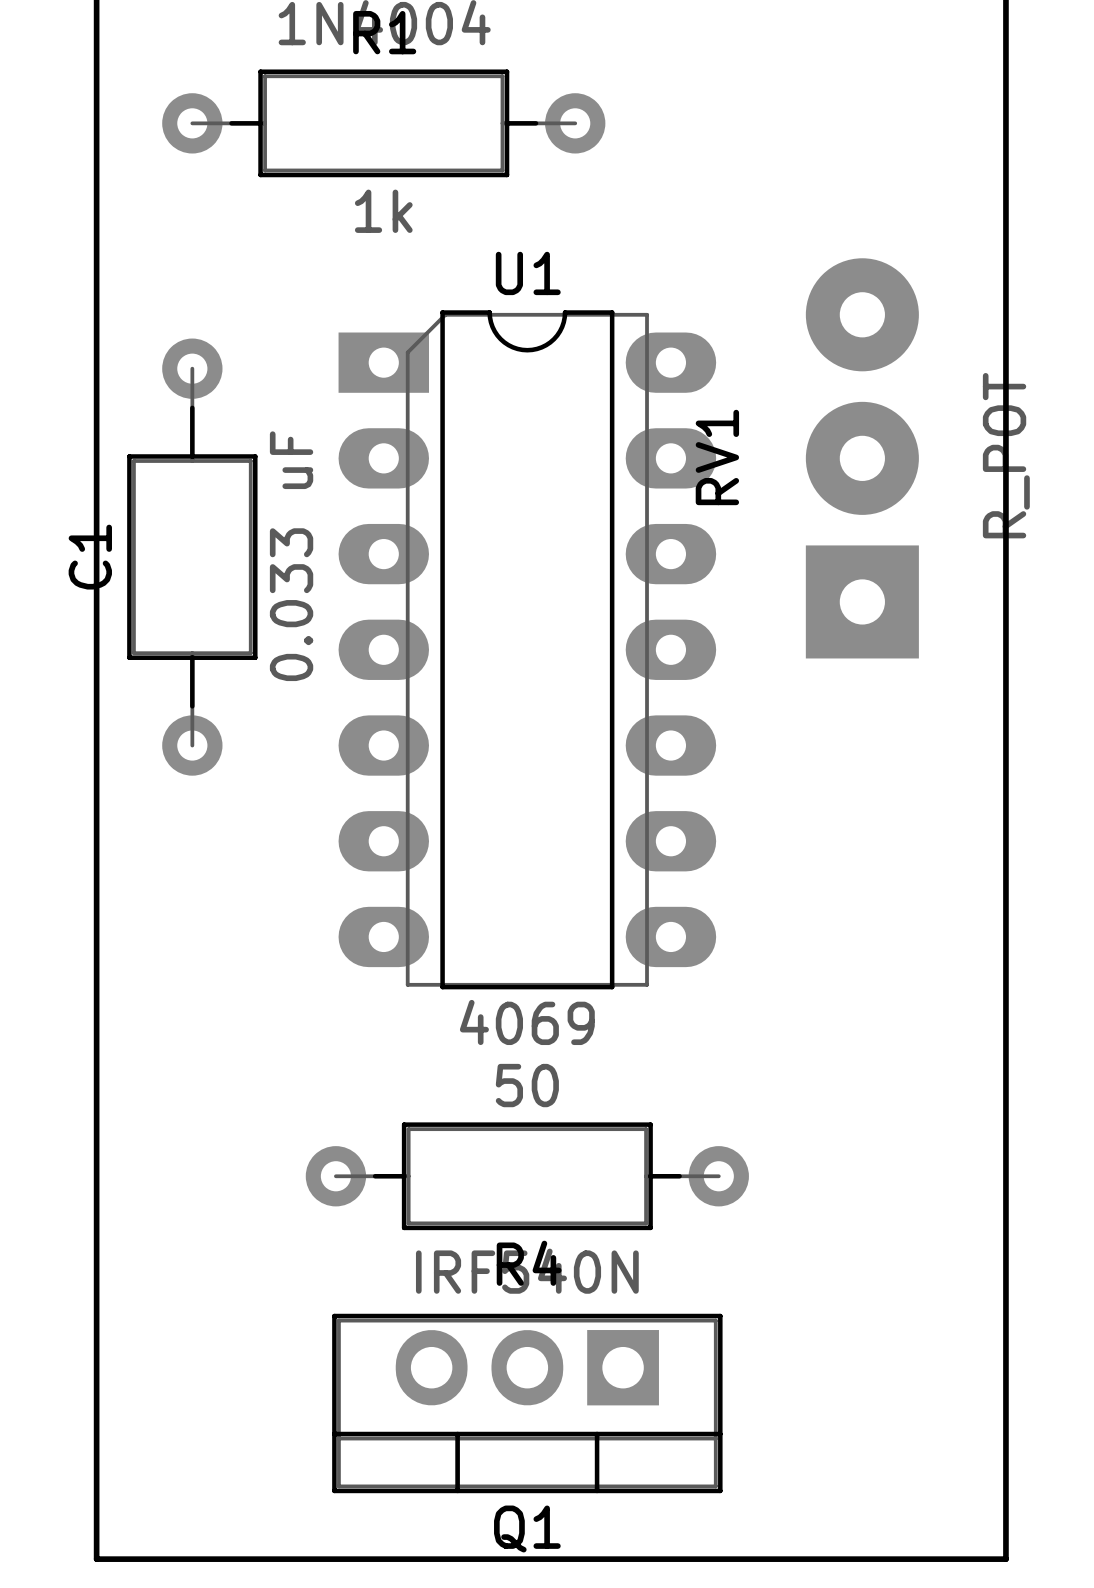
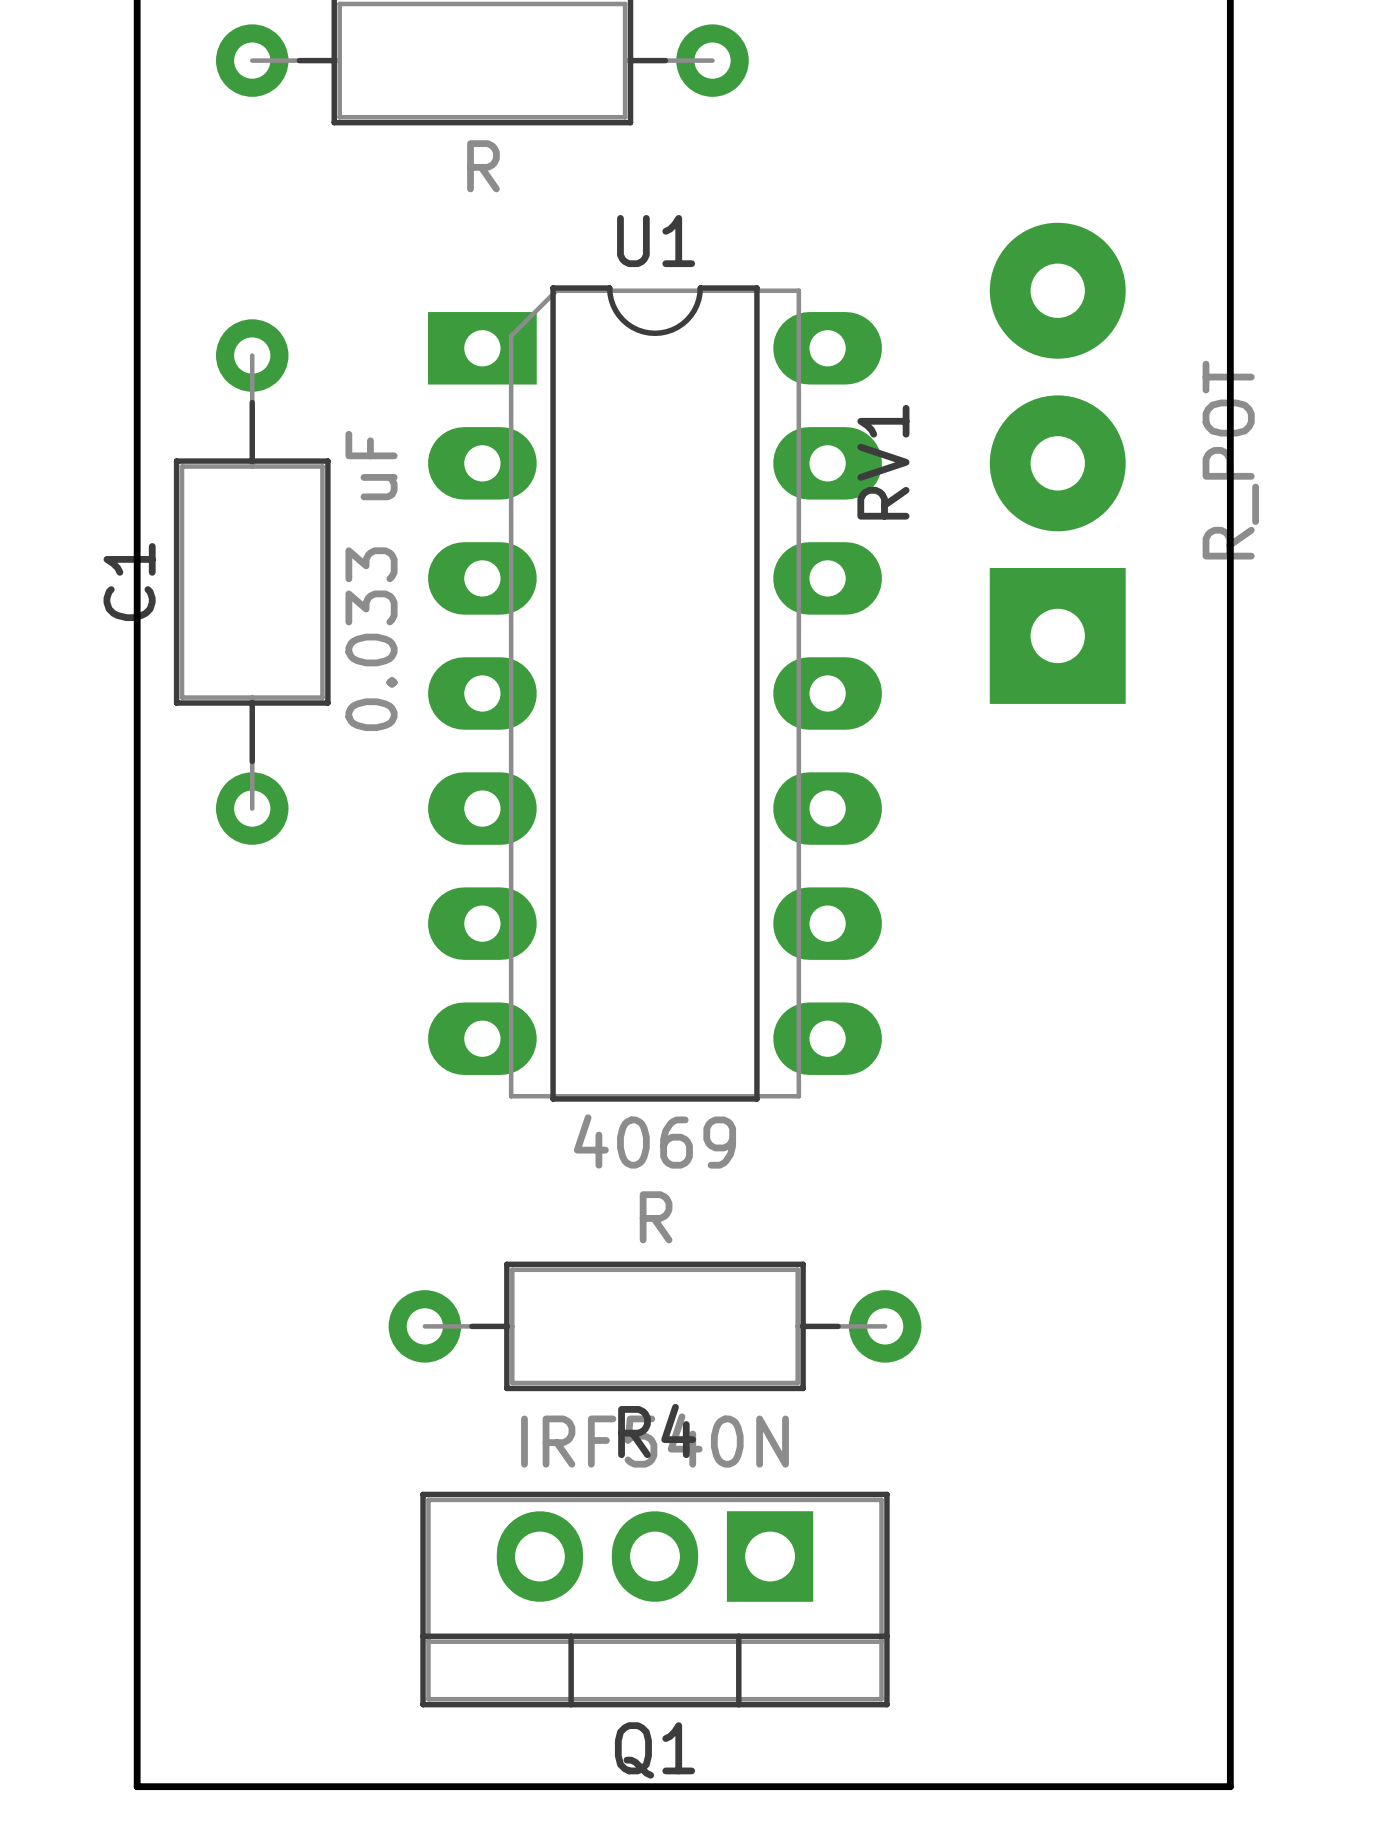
R1 value: 1k (383, 211) -> R (483, 166)
R4 value: 50 (527, 1085) -> R (656, 1217)

